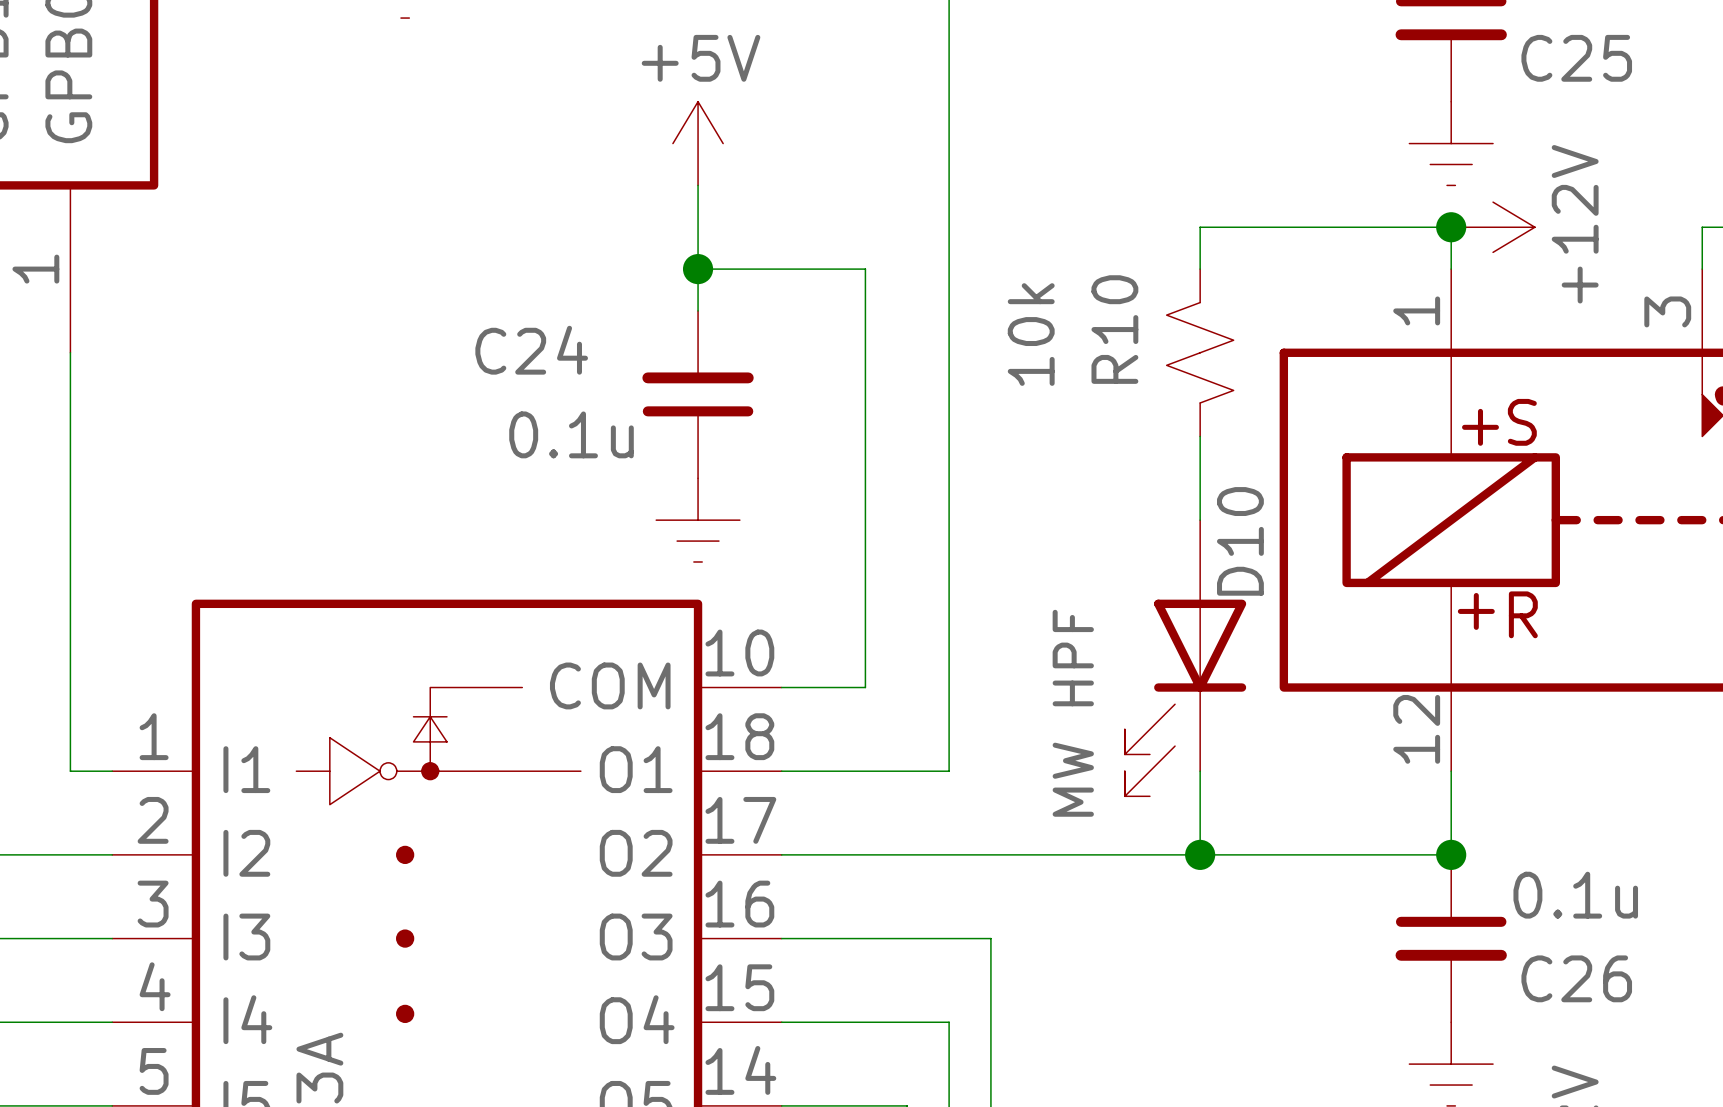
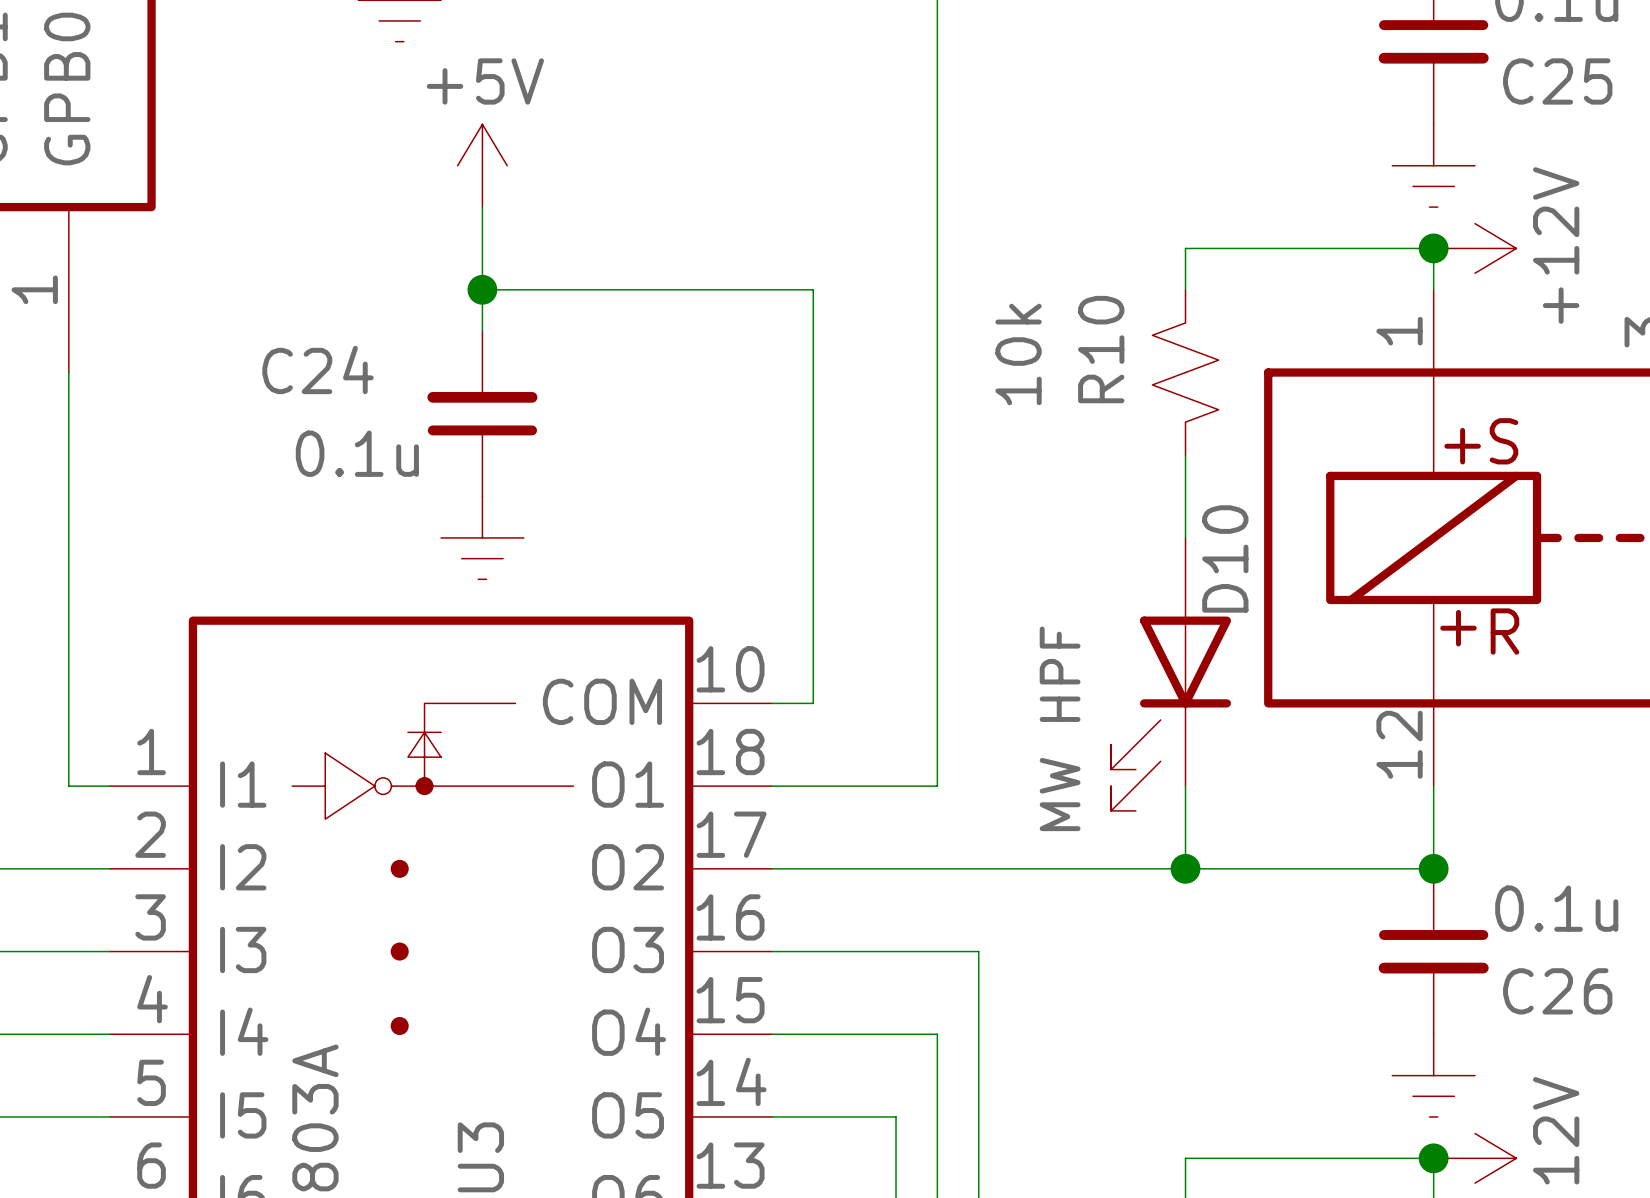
power symbol position: +5V (698, 143) -> +5V (482, 165)
wire: (698, 185) (698, 310) -> (482, 207) (482, 331)
wire: none -> (482, 289) (689, 289)
junction: none -> (482, 289)
junction: (698, 269) -> none
wire: (823, 269) (865, 269) (865, 687) (823, 687) -> (813, 289) (813, 703)
C24 position: (698, 394) -> (482, 413)
power symbol position: (698, 520) -> (482, 537)

